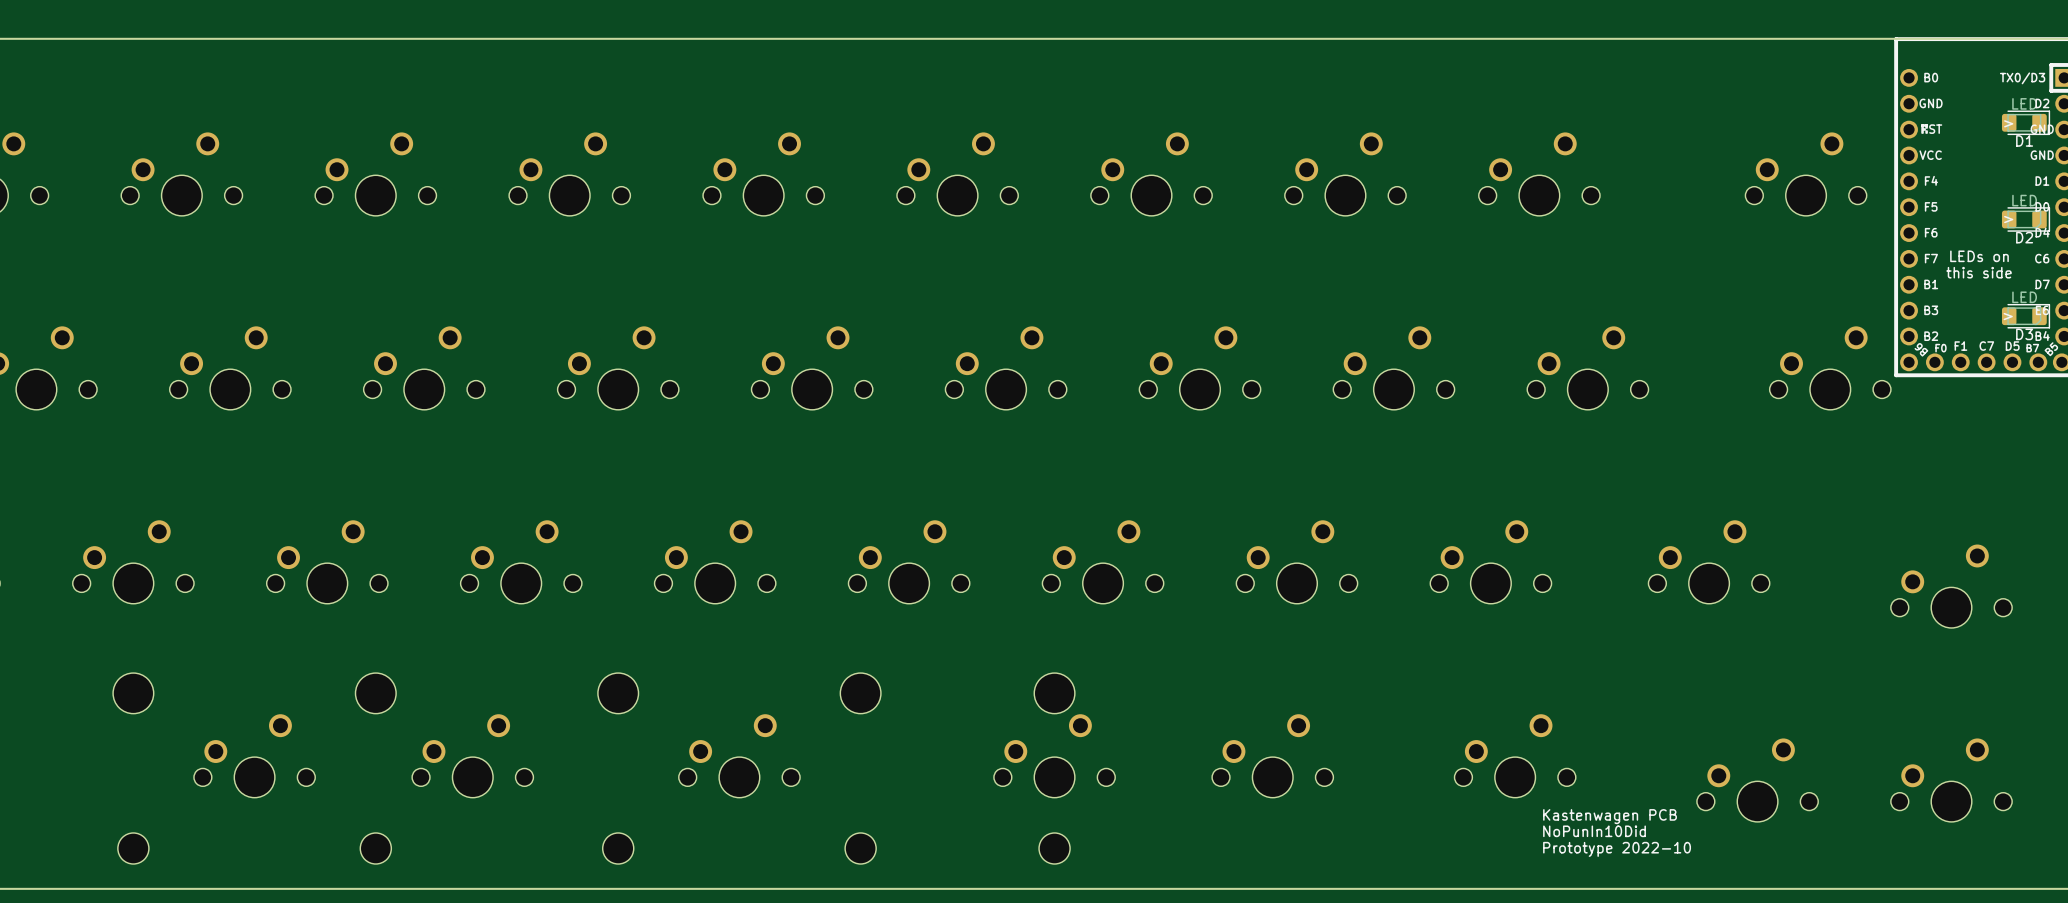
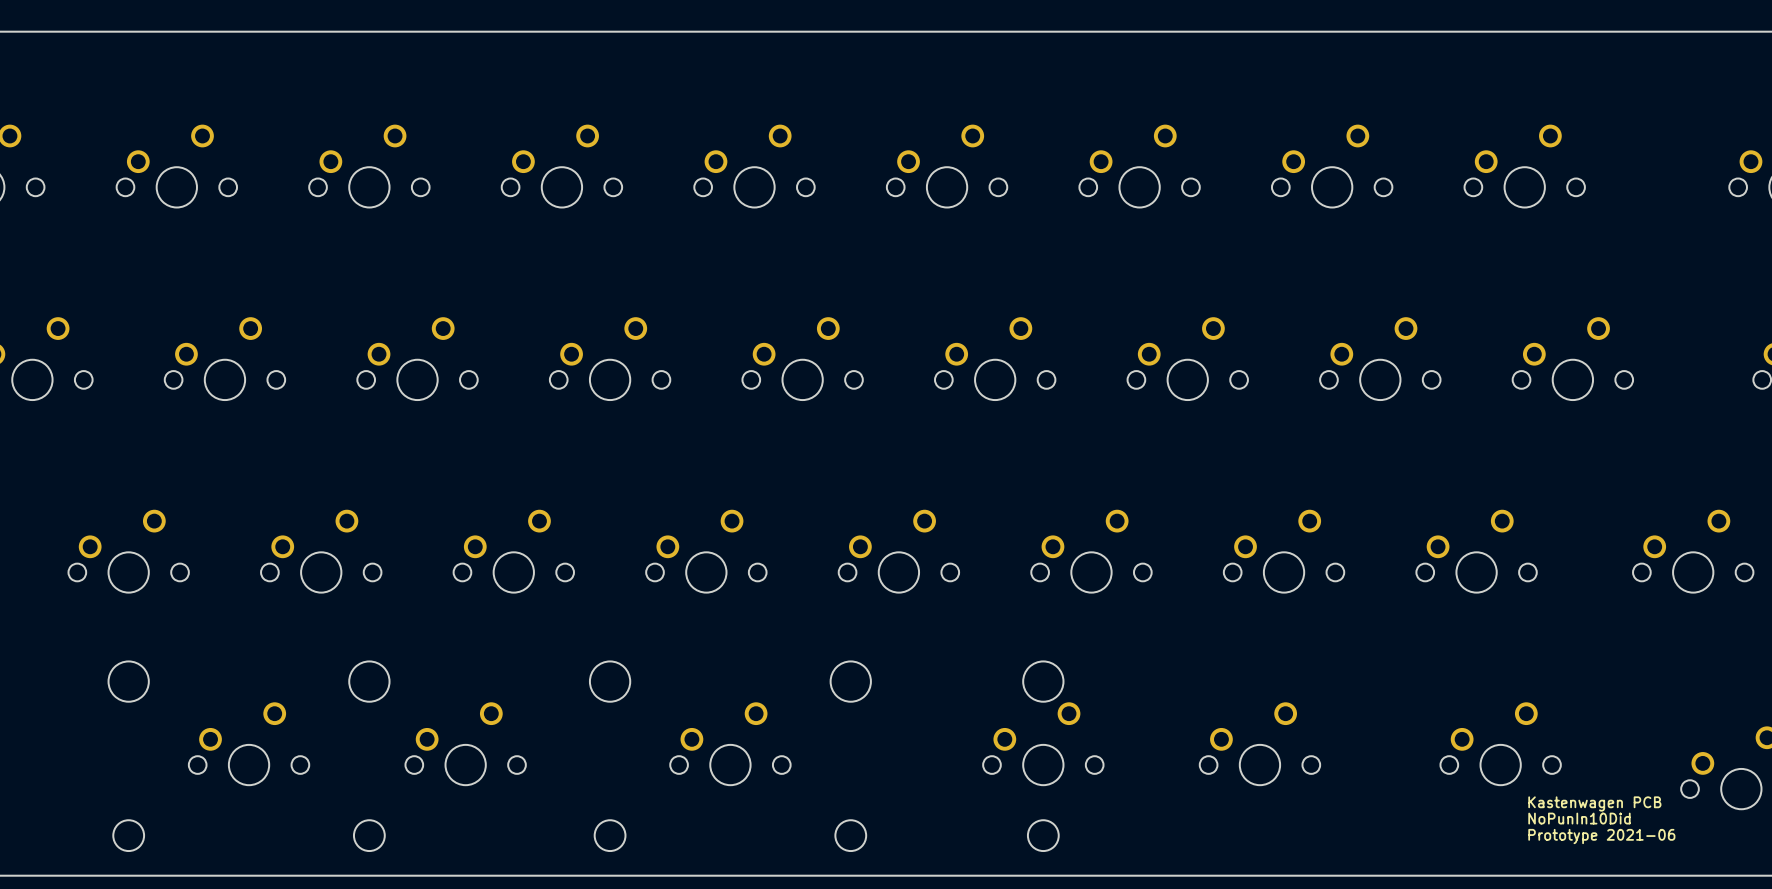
text: Prototype 2022-10 (1617, 849) -> Prototype 2021-06 (1601, 836)

